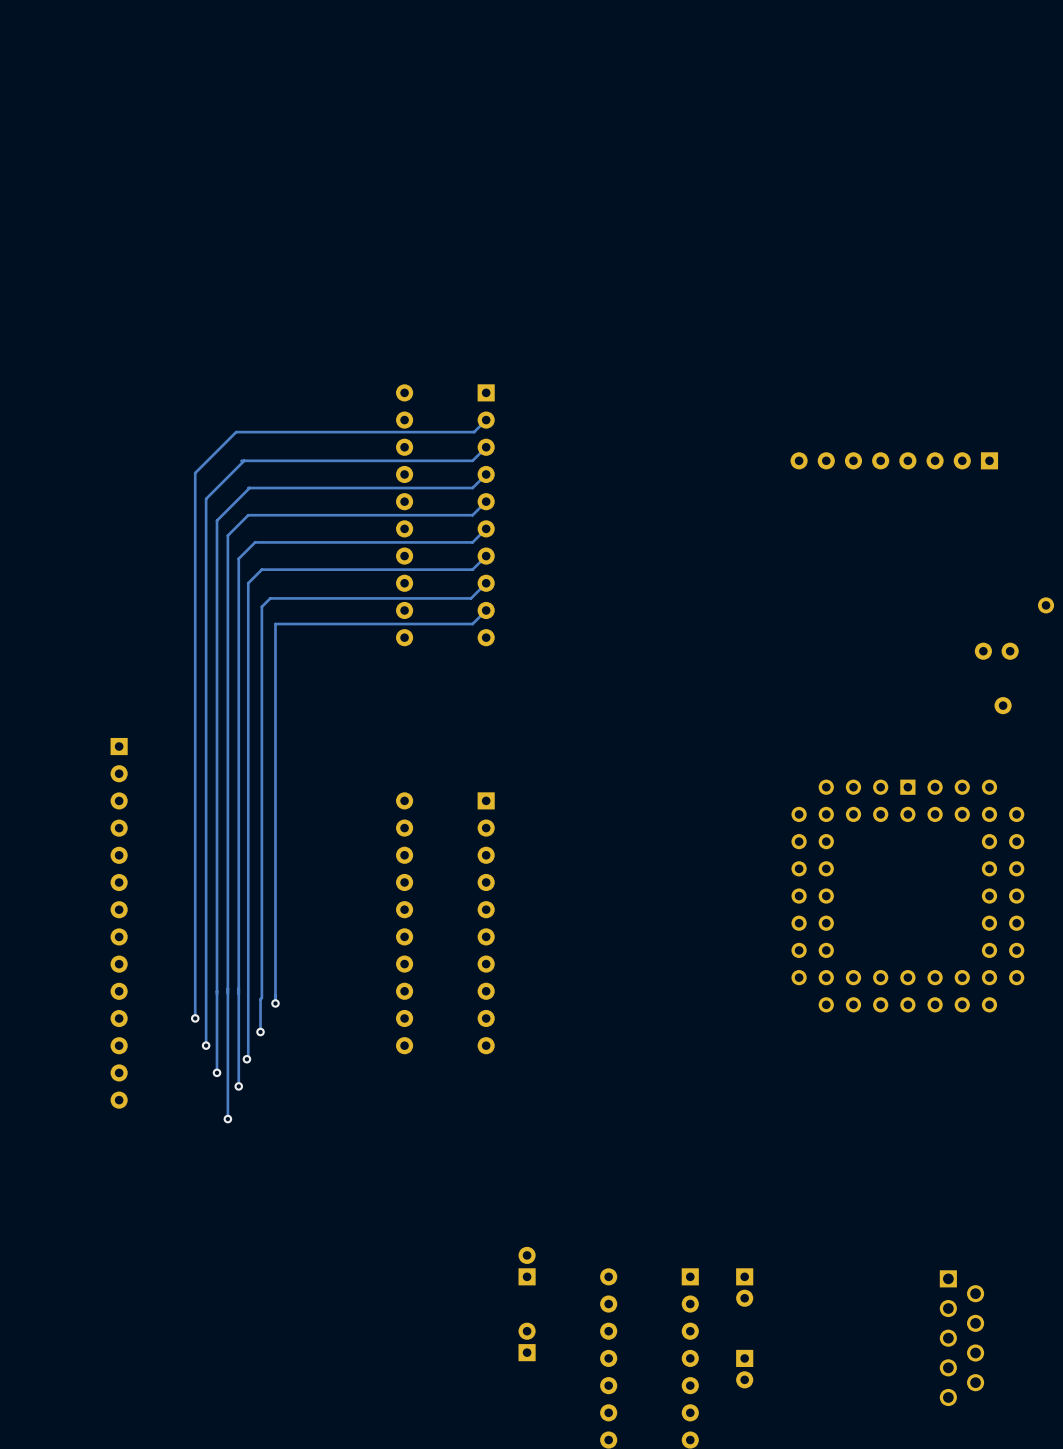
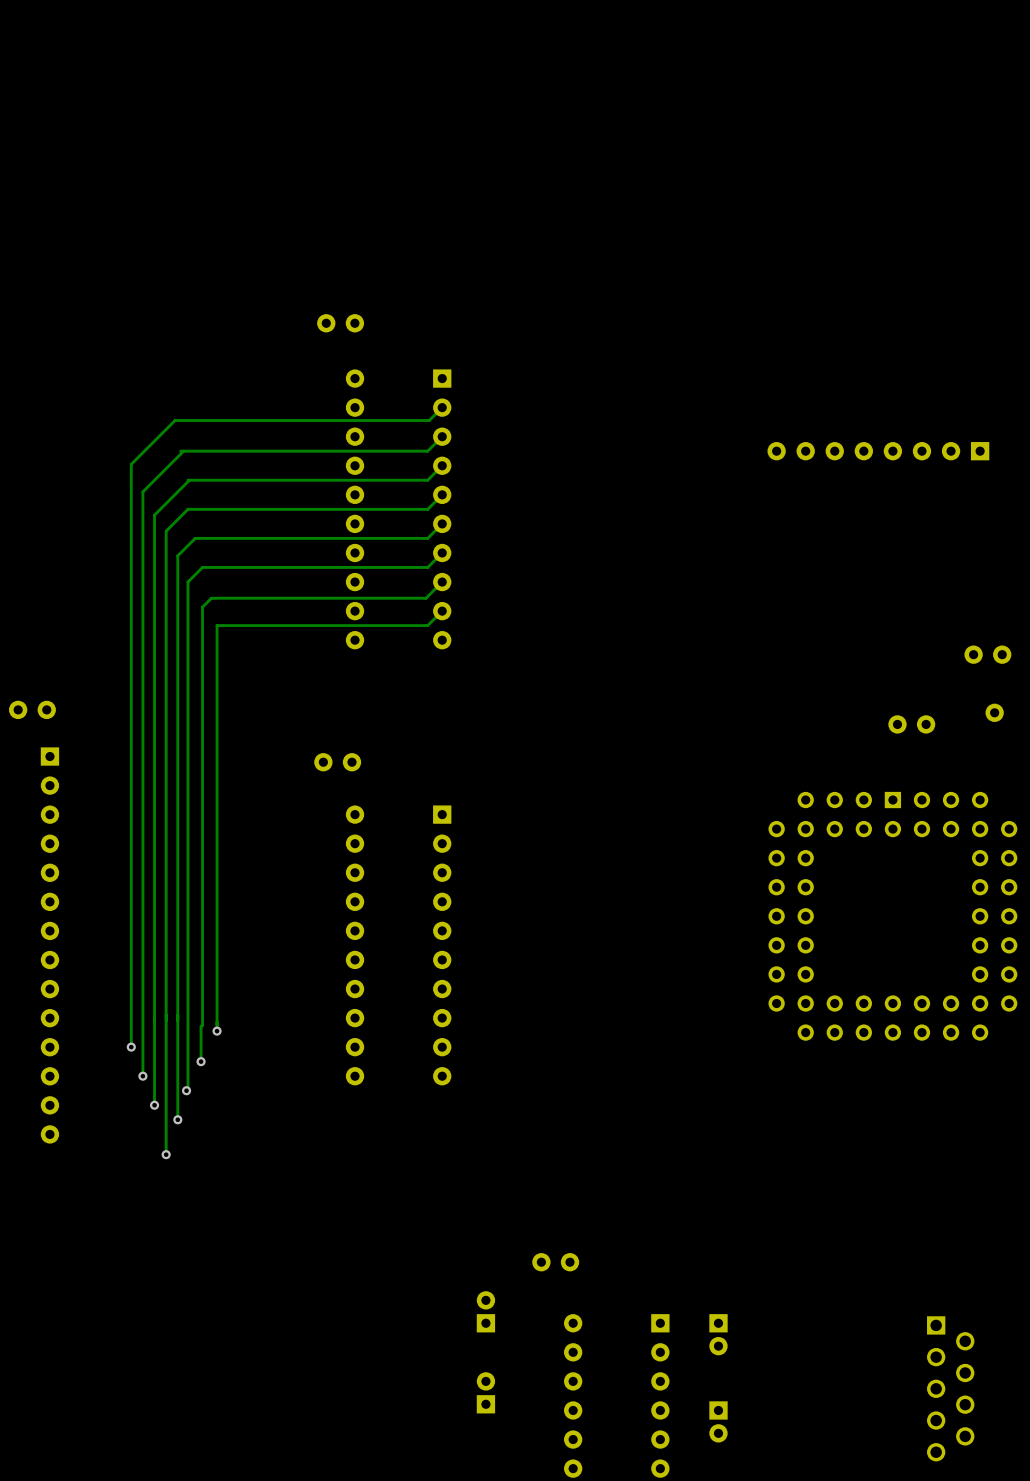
part: none -> (340, 323)
part: none -> (32, 709)
part: none -> (911, 724)
part: none -> (337, 762)
part: none -> (555, 1262)

